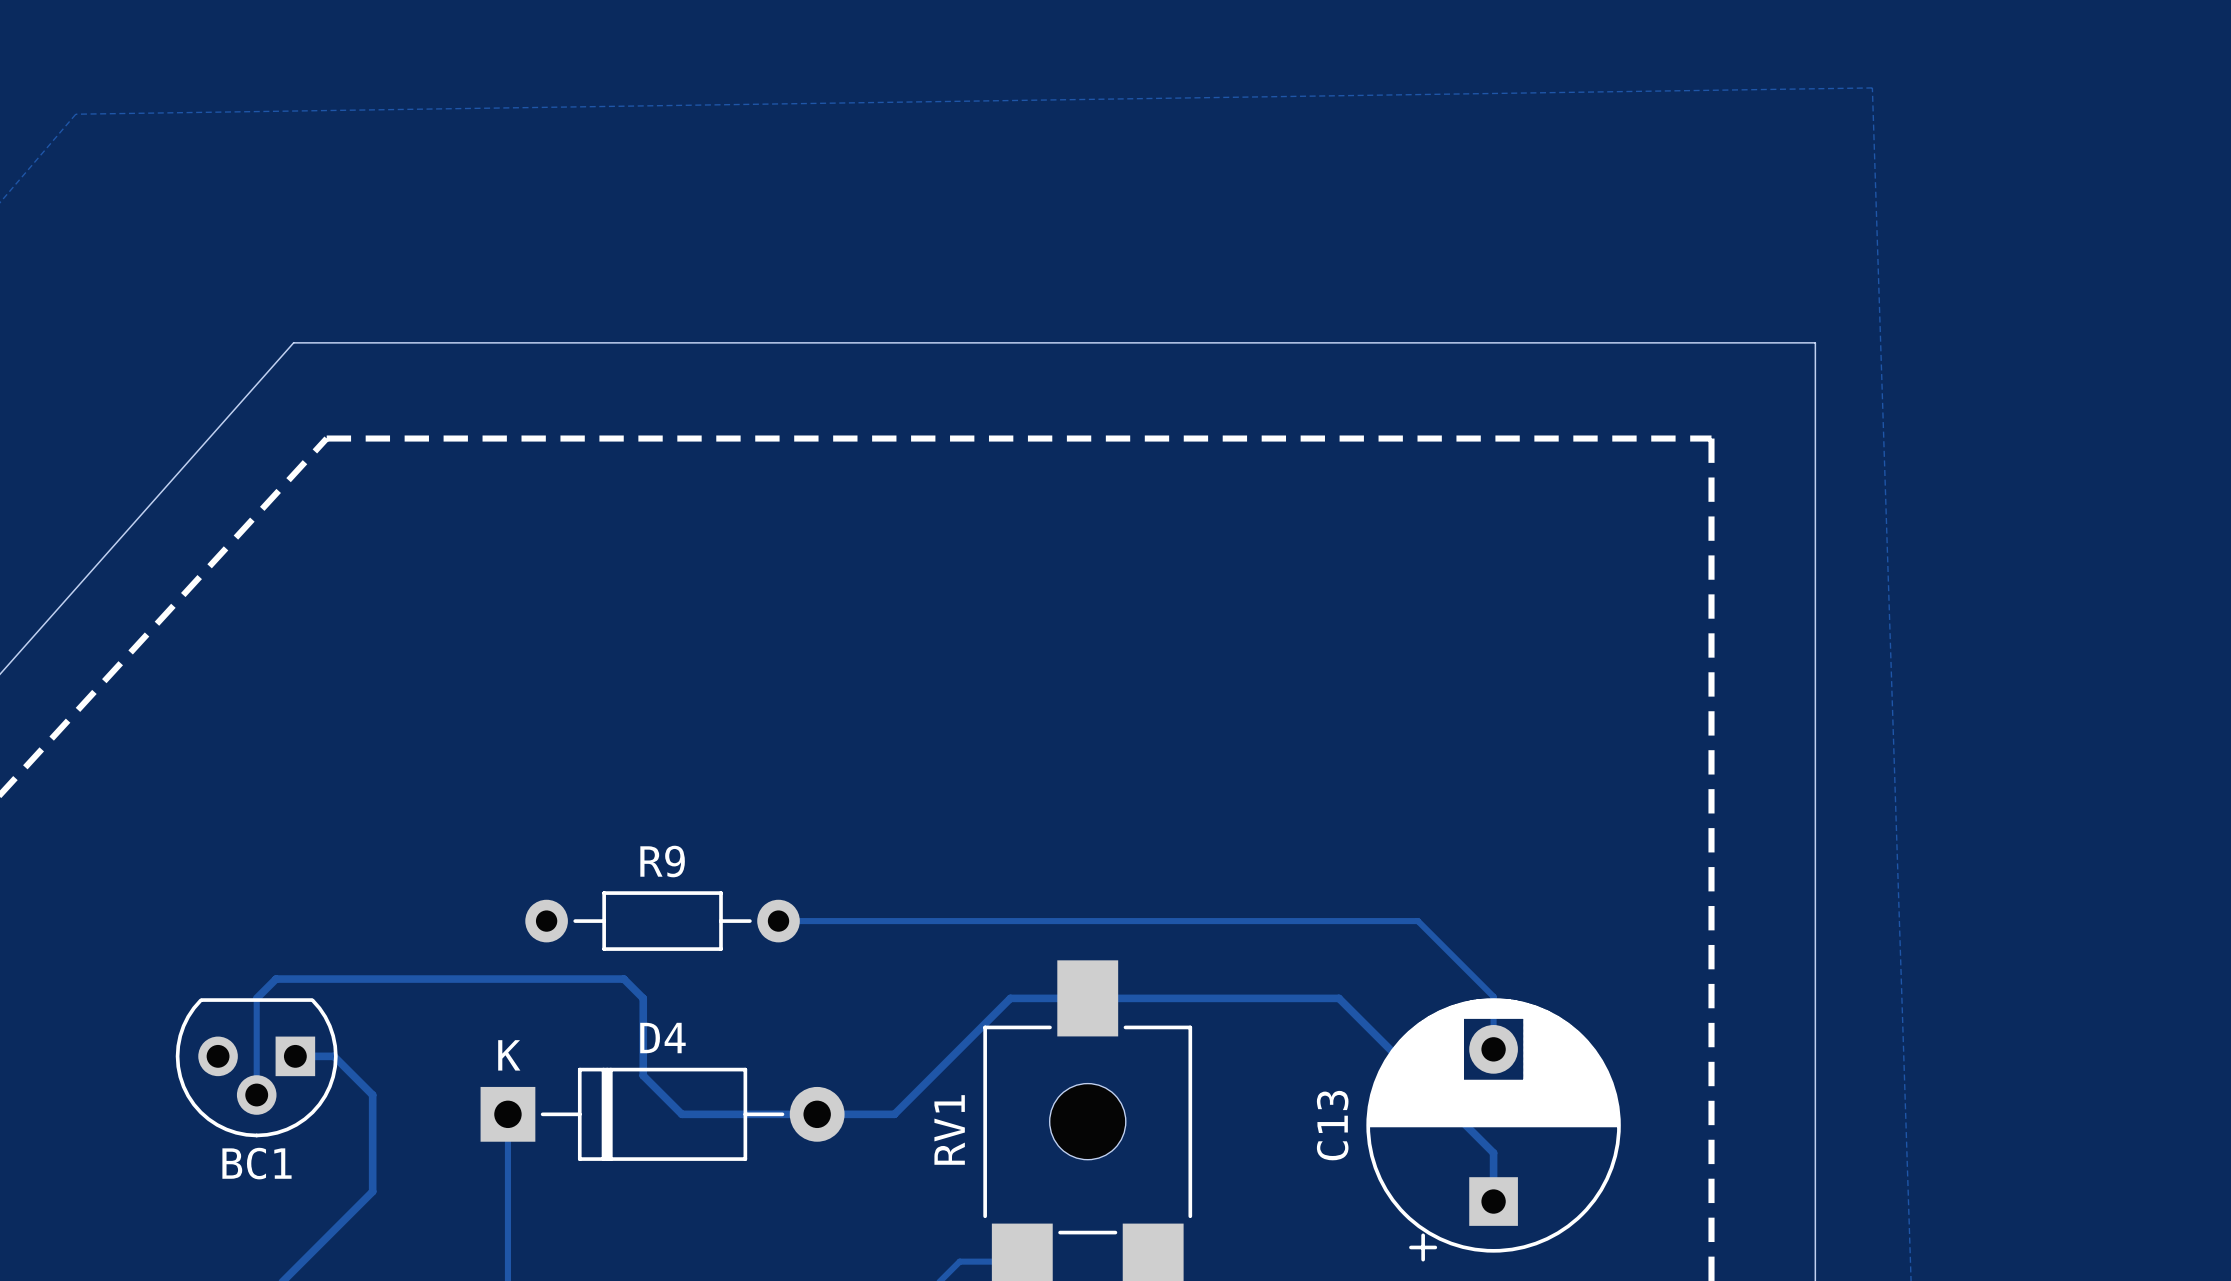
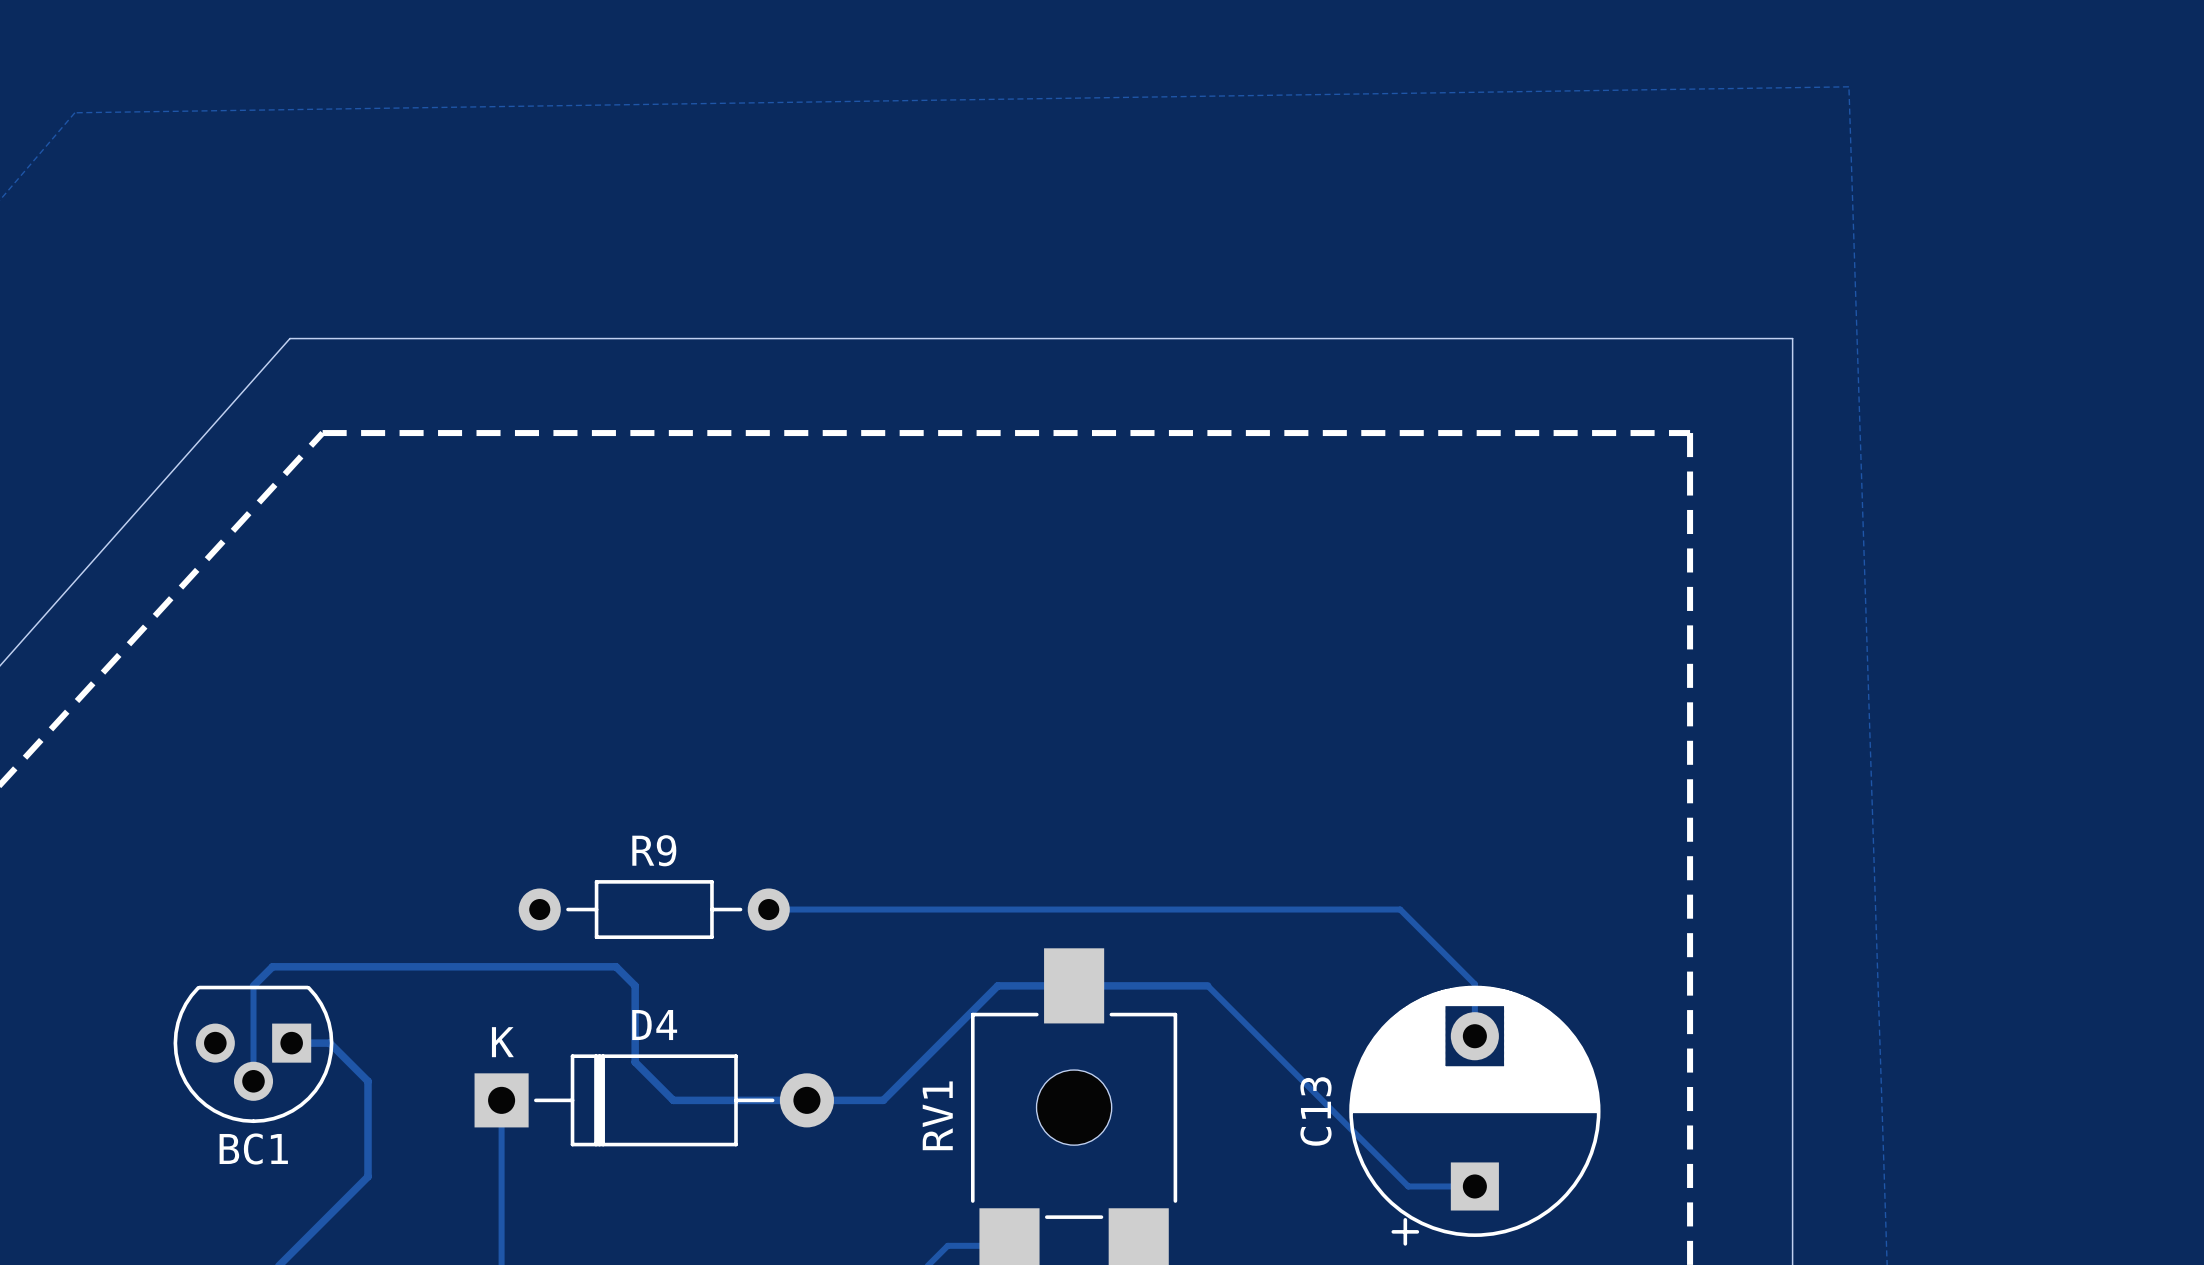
track: (1223, 998) (1338, 998) (1493, 1152) (1493, 1201) -> (1207, 985) (1408, 1186) (1474, 1186)

